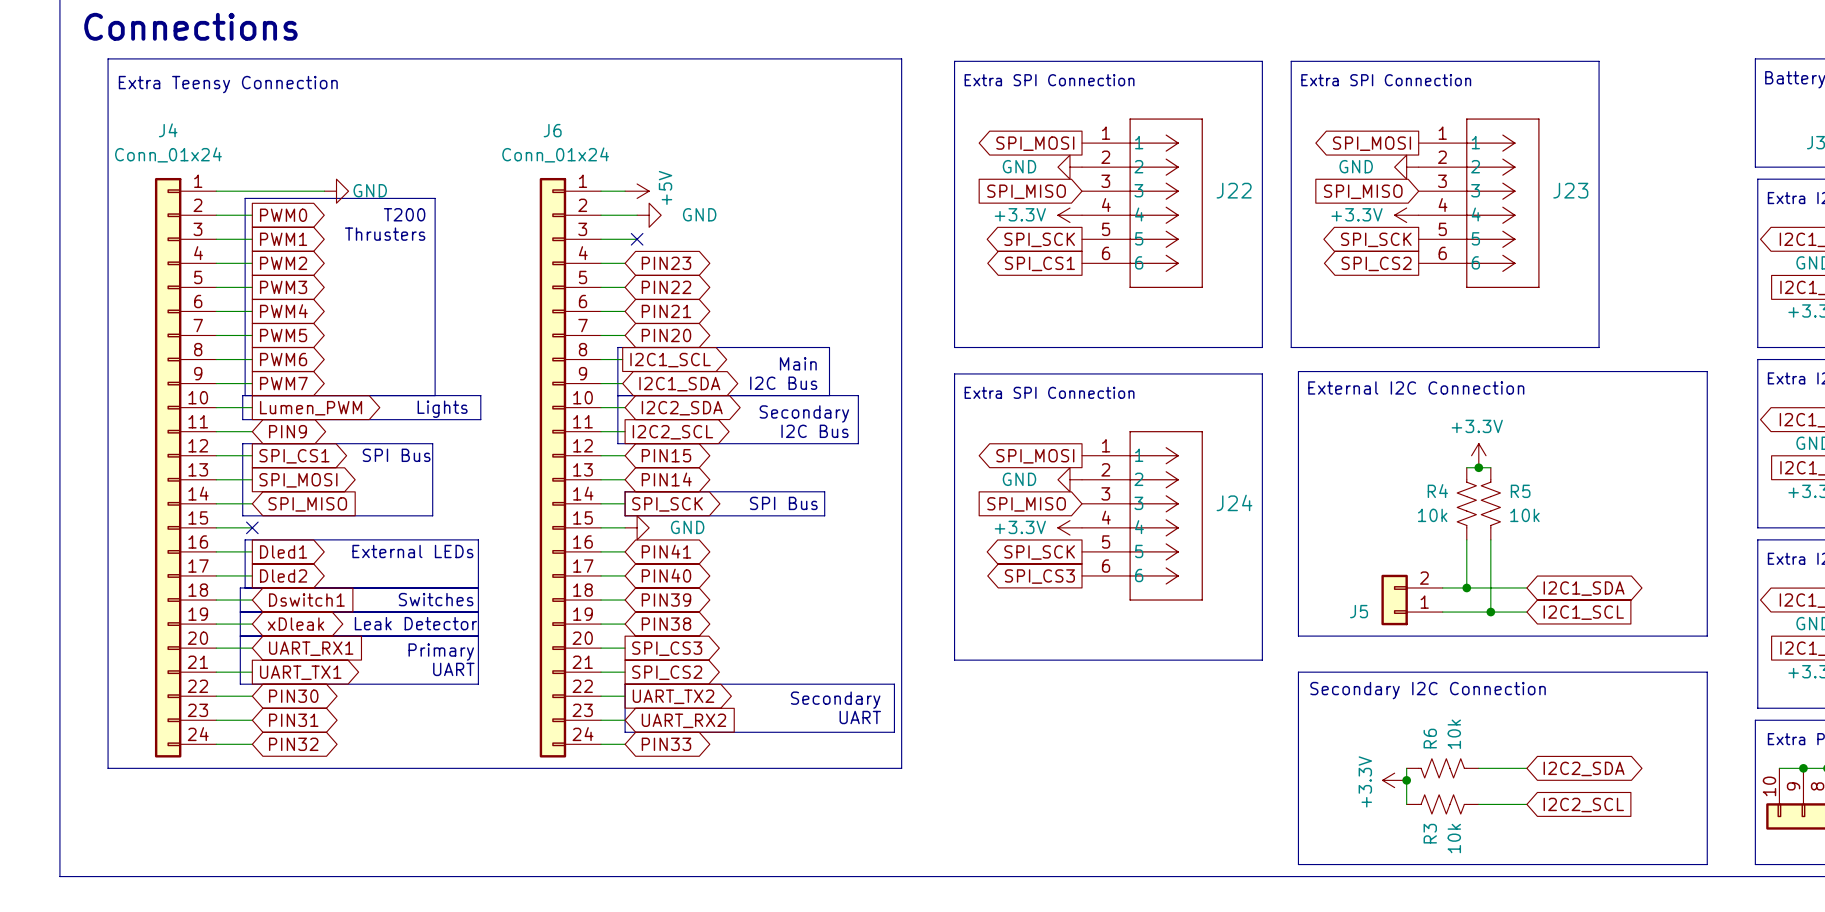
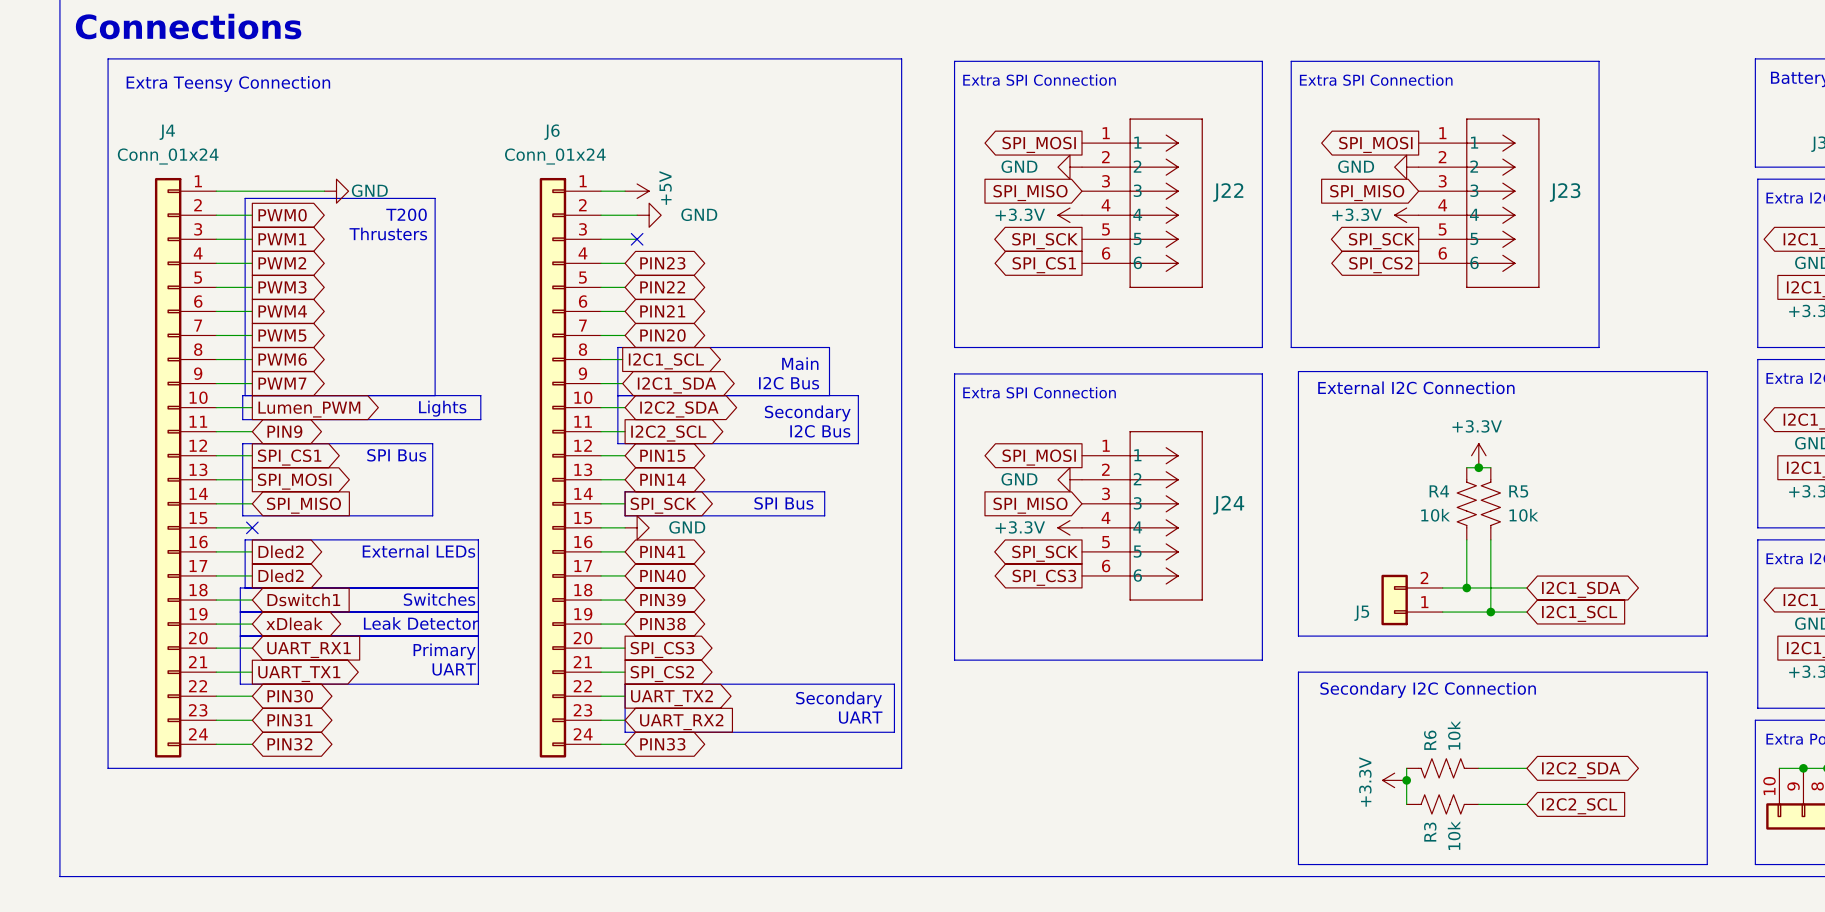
global label: Dled1 (283, 551) -> Dled2 (281, 551)

